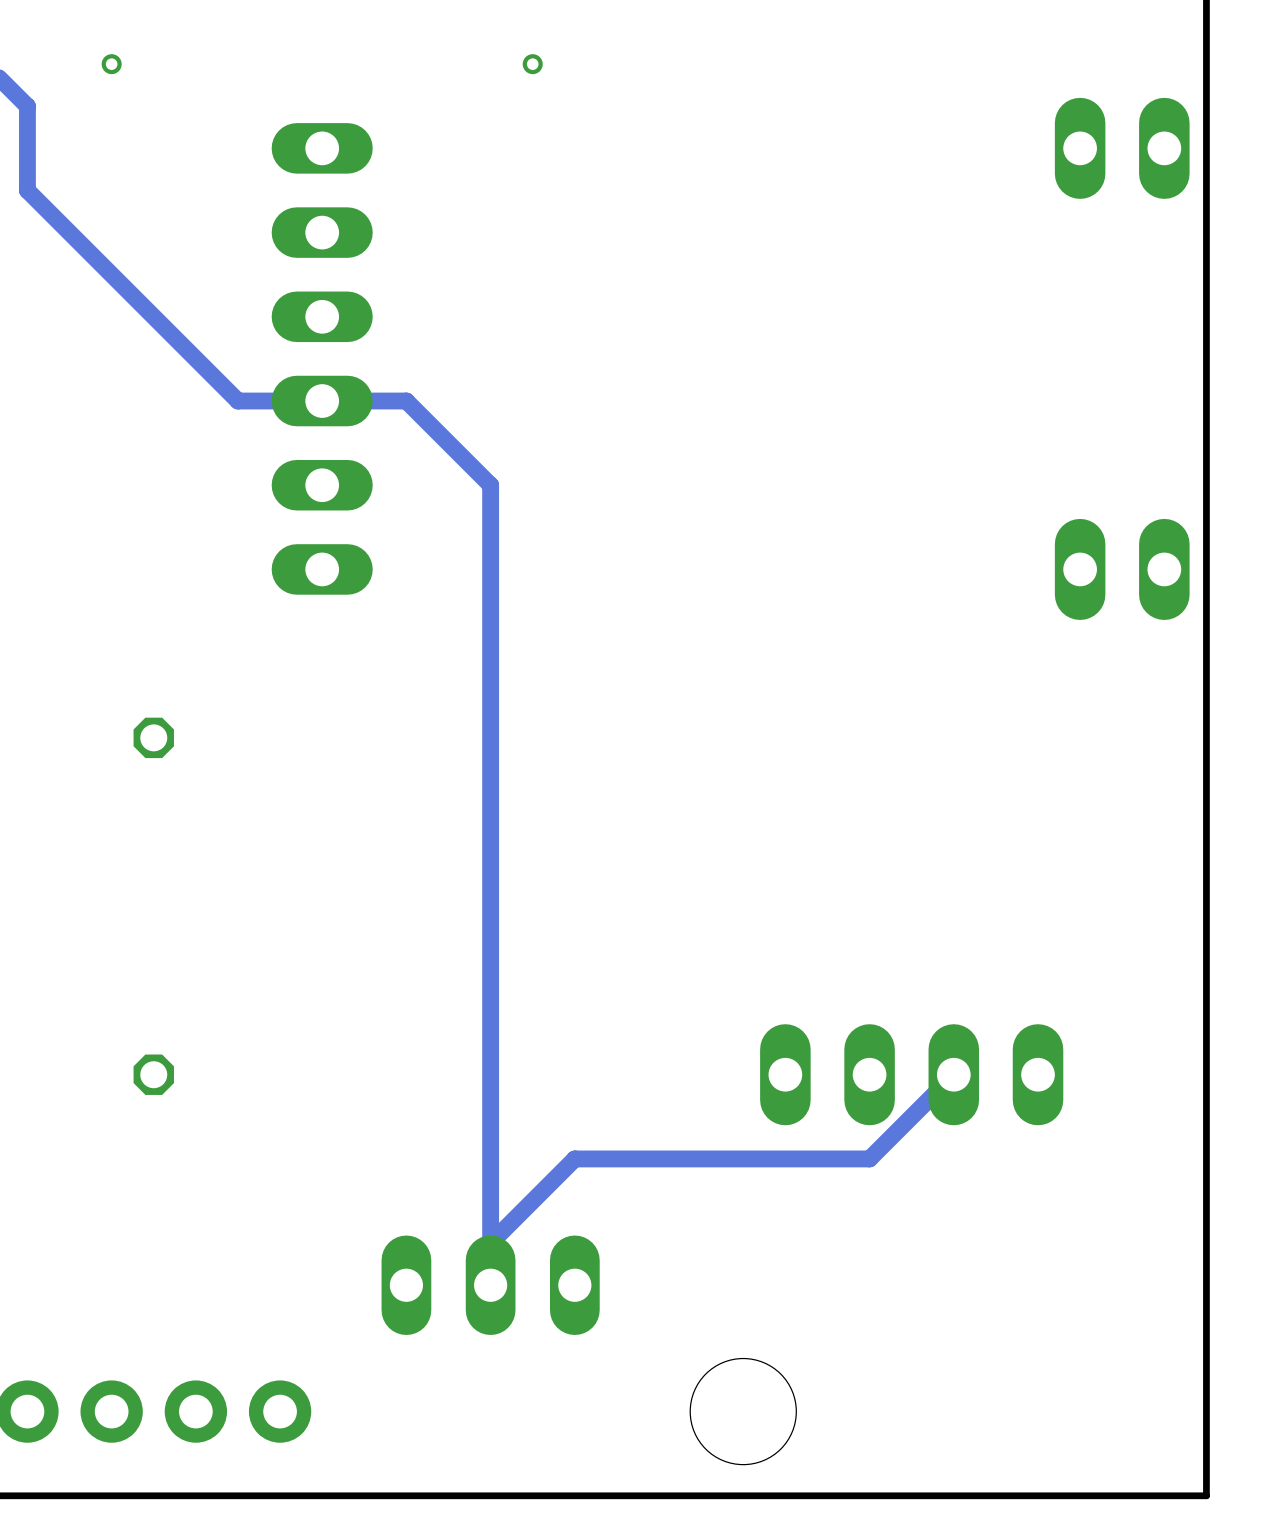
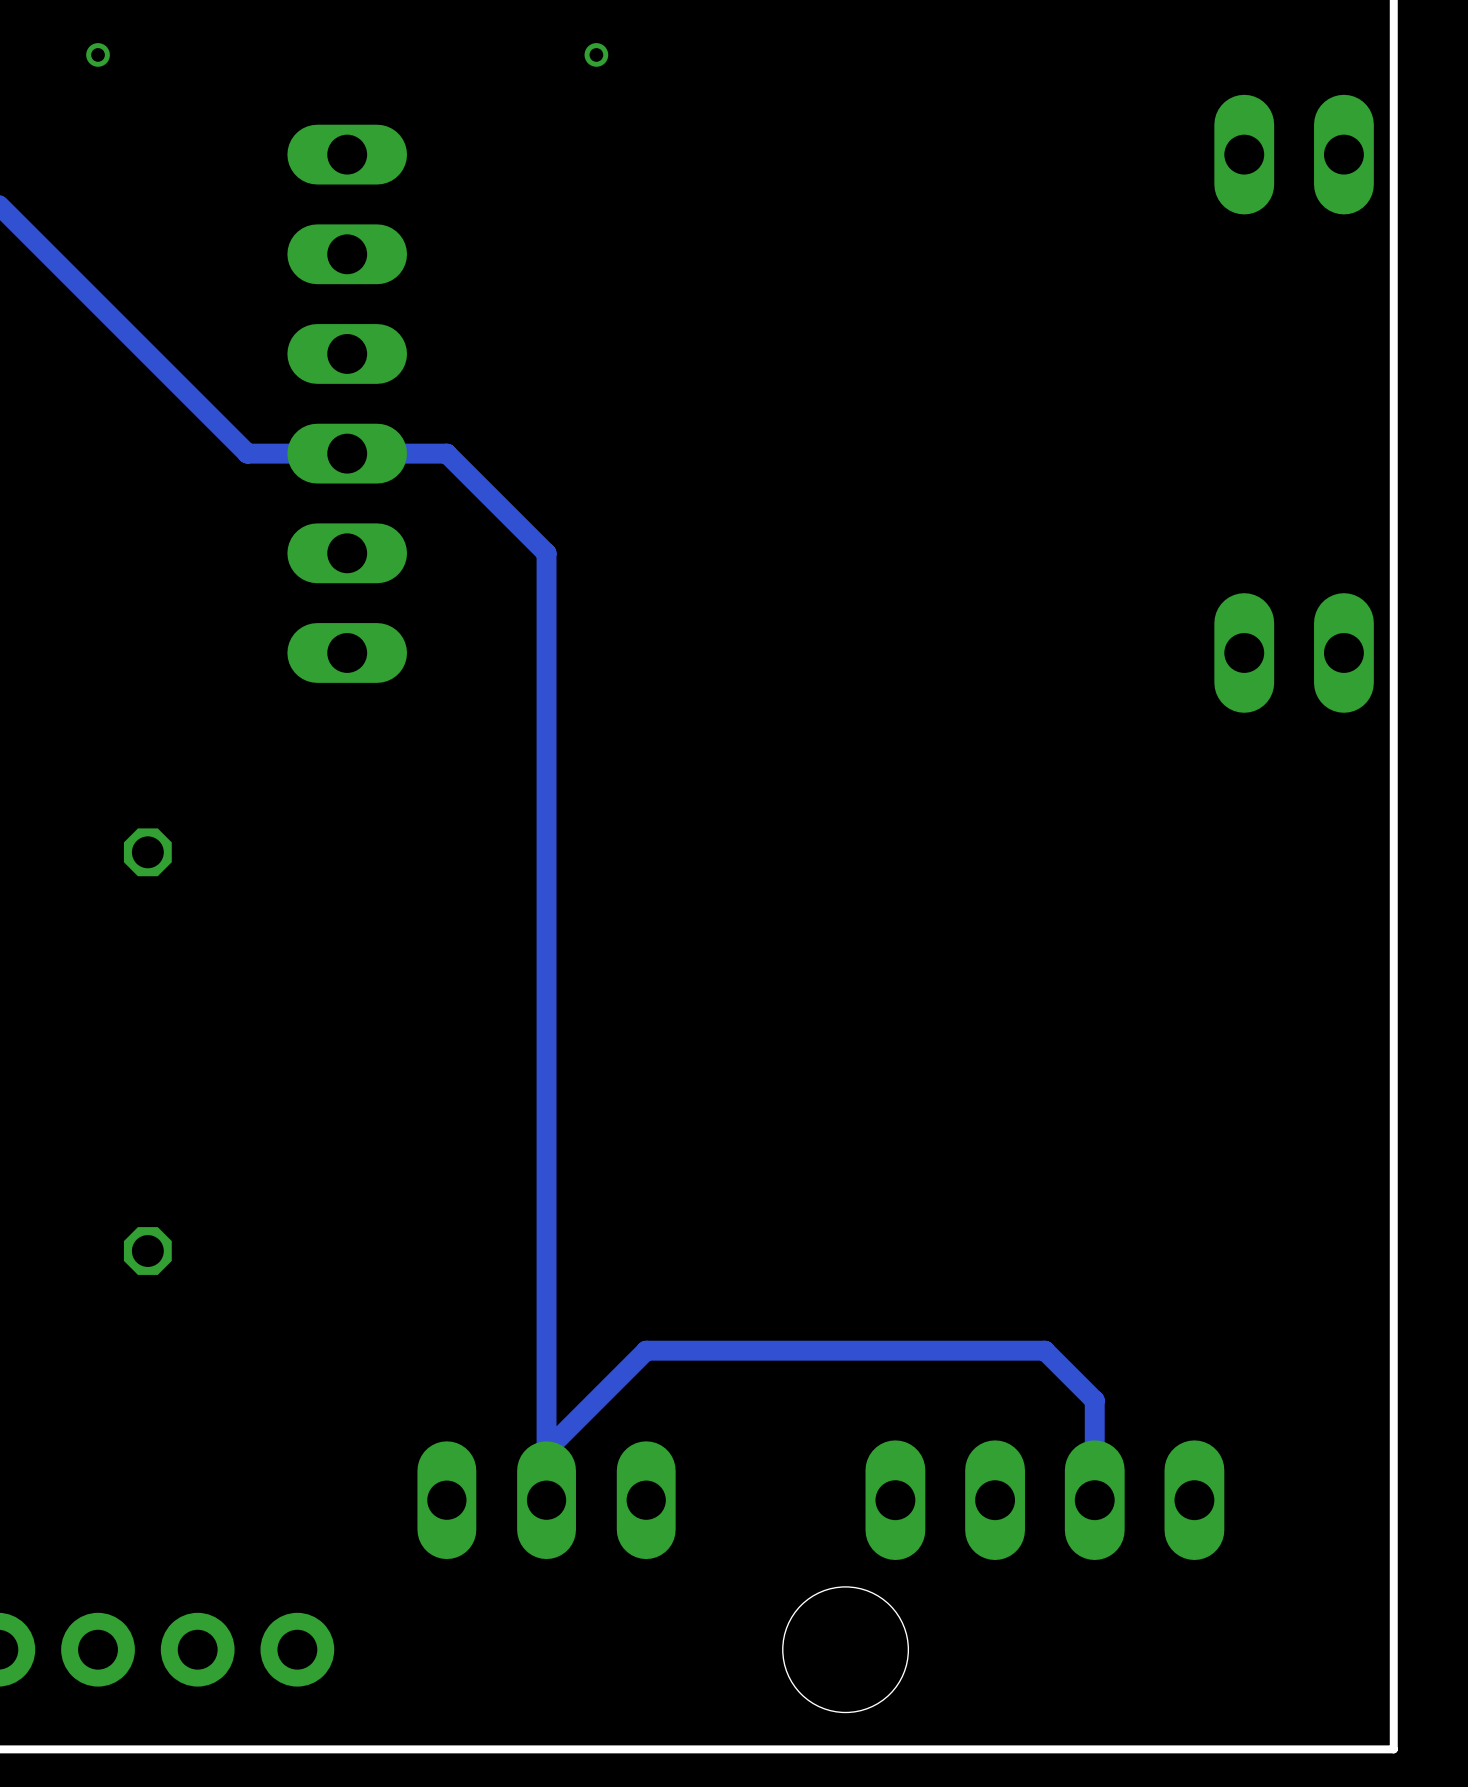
part position: (911, 1074) -> (1044, 1500)
track: (953, 1074) (869, 1158) -> (1094, 1500) (1094, 1400) (1044, 1350) (995, 1350)

